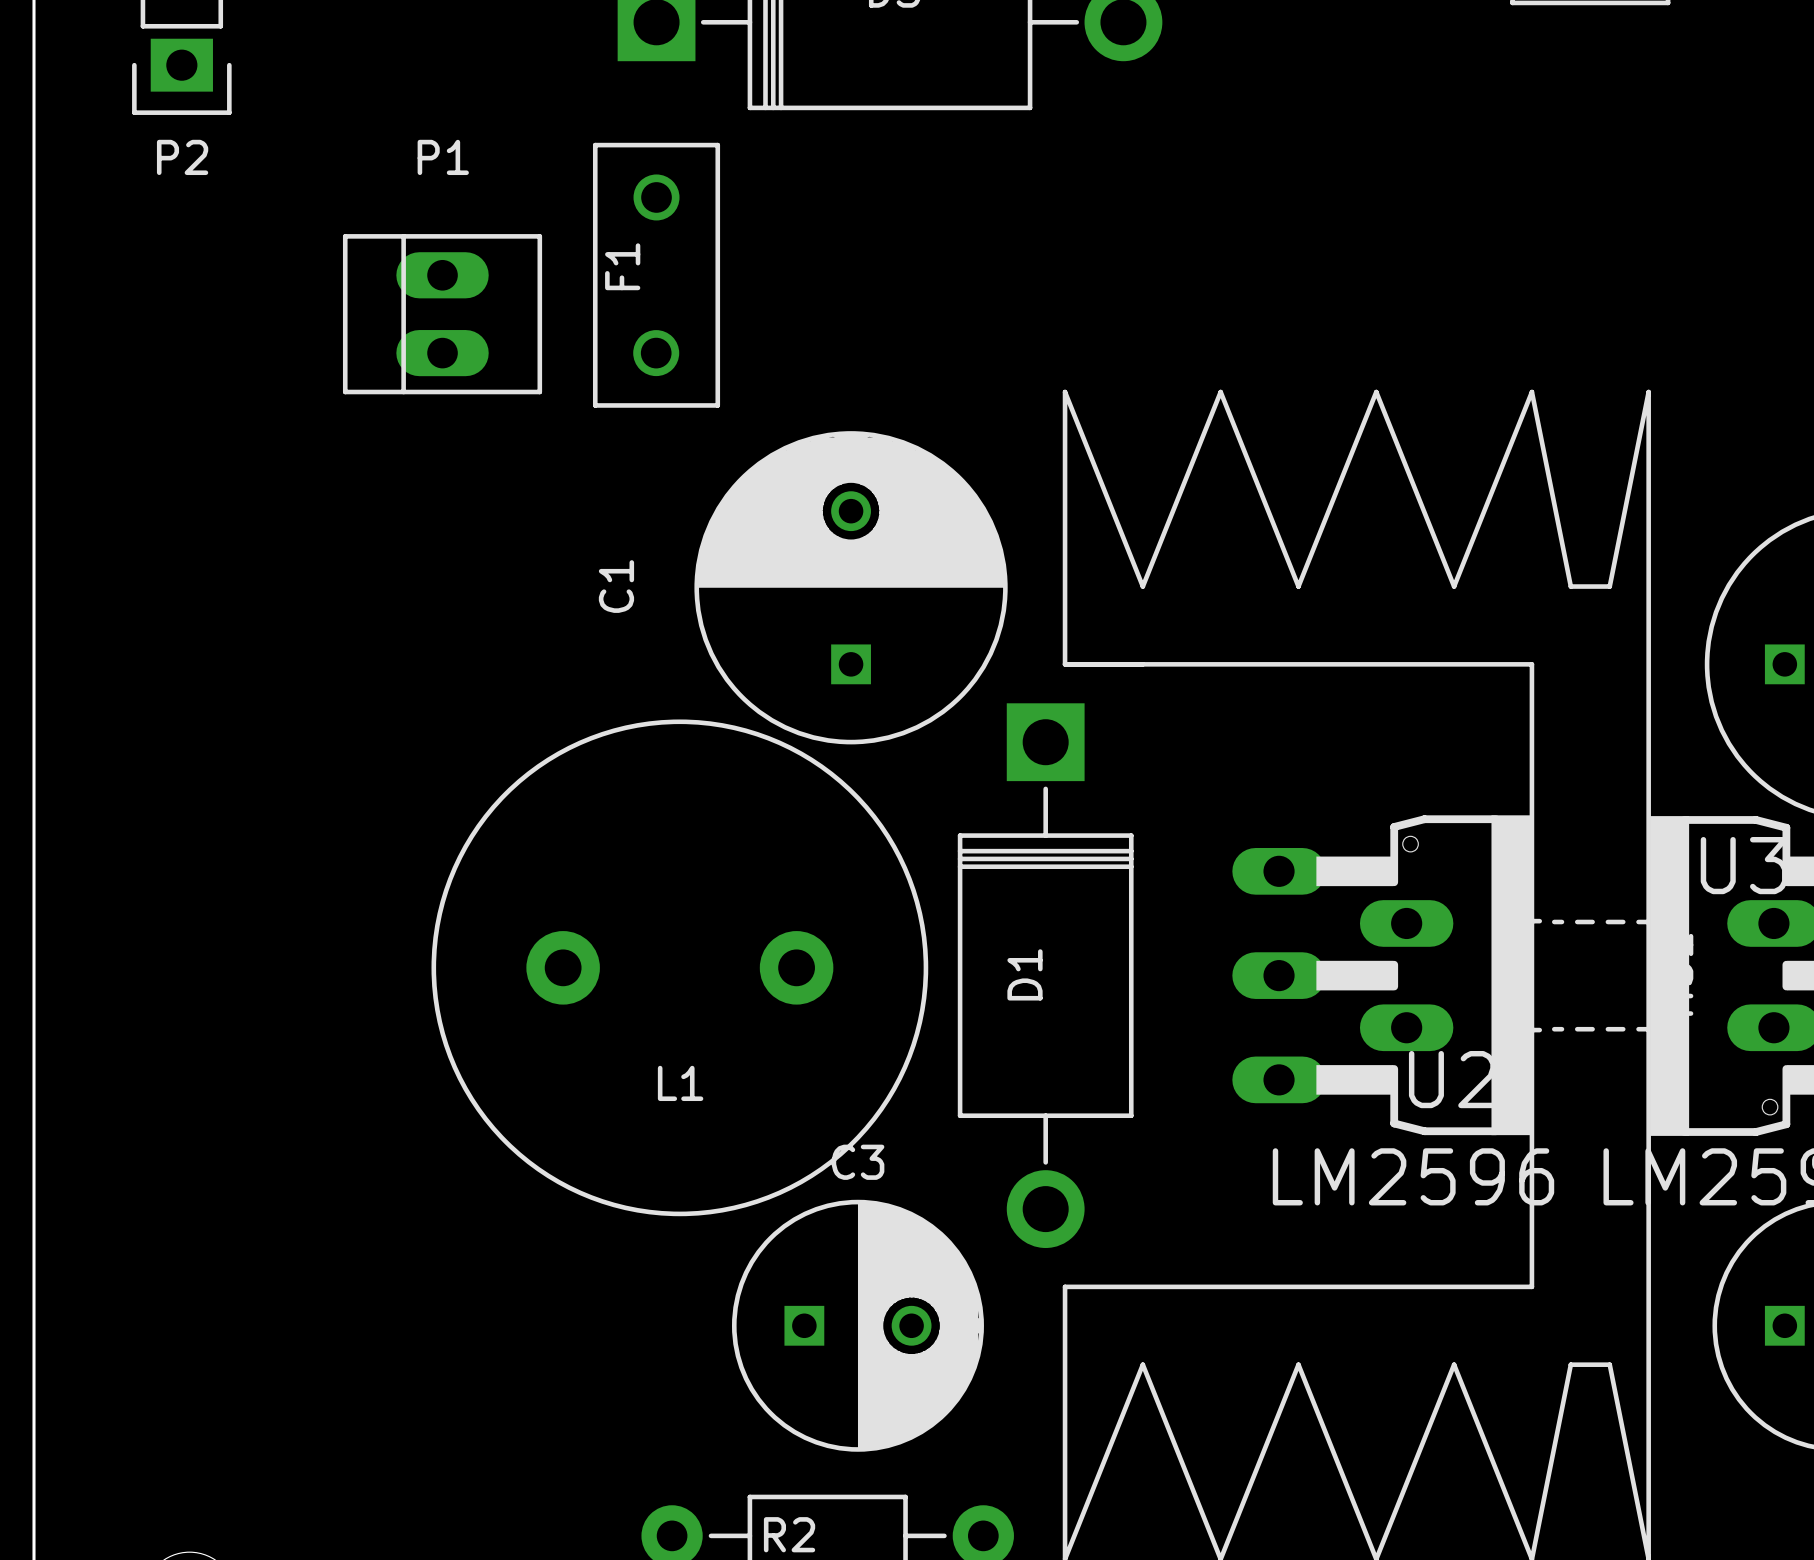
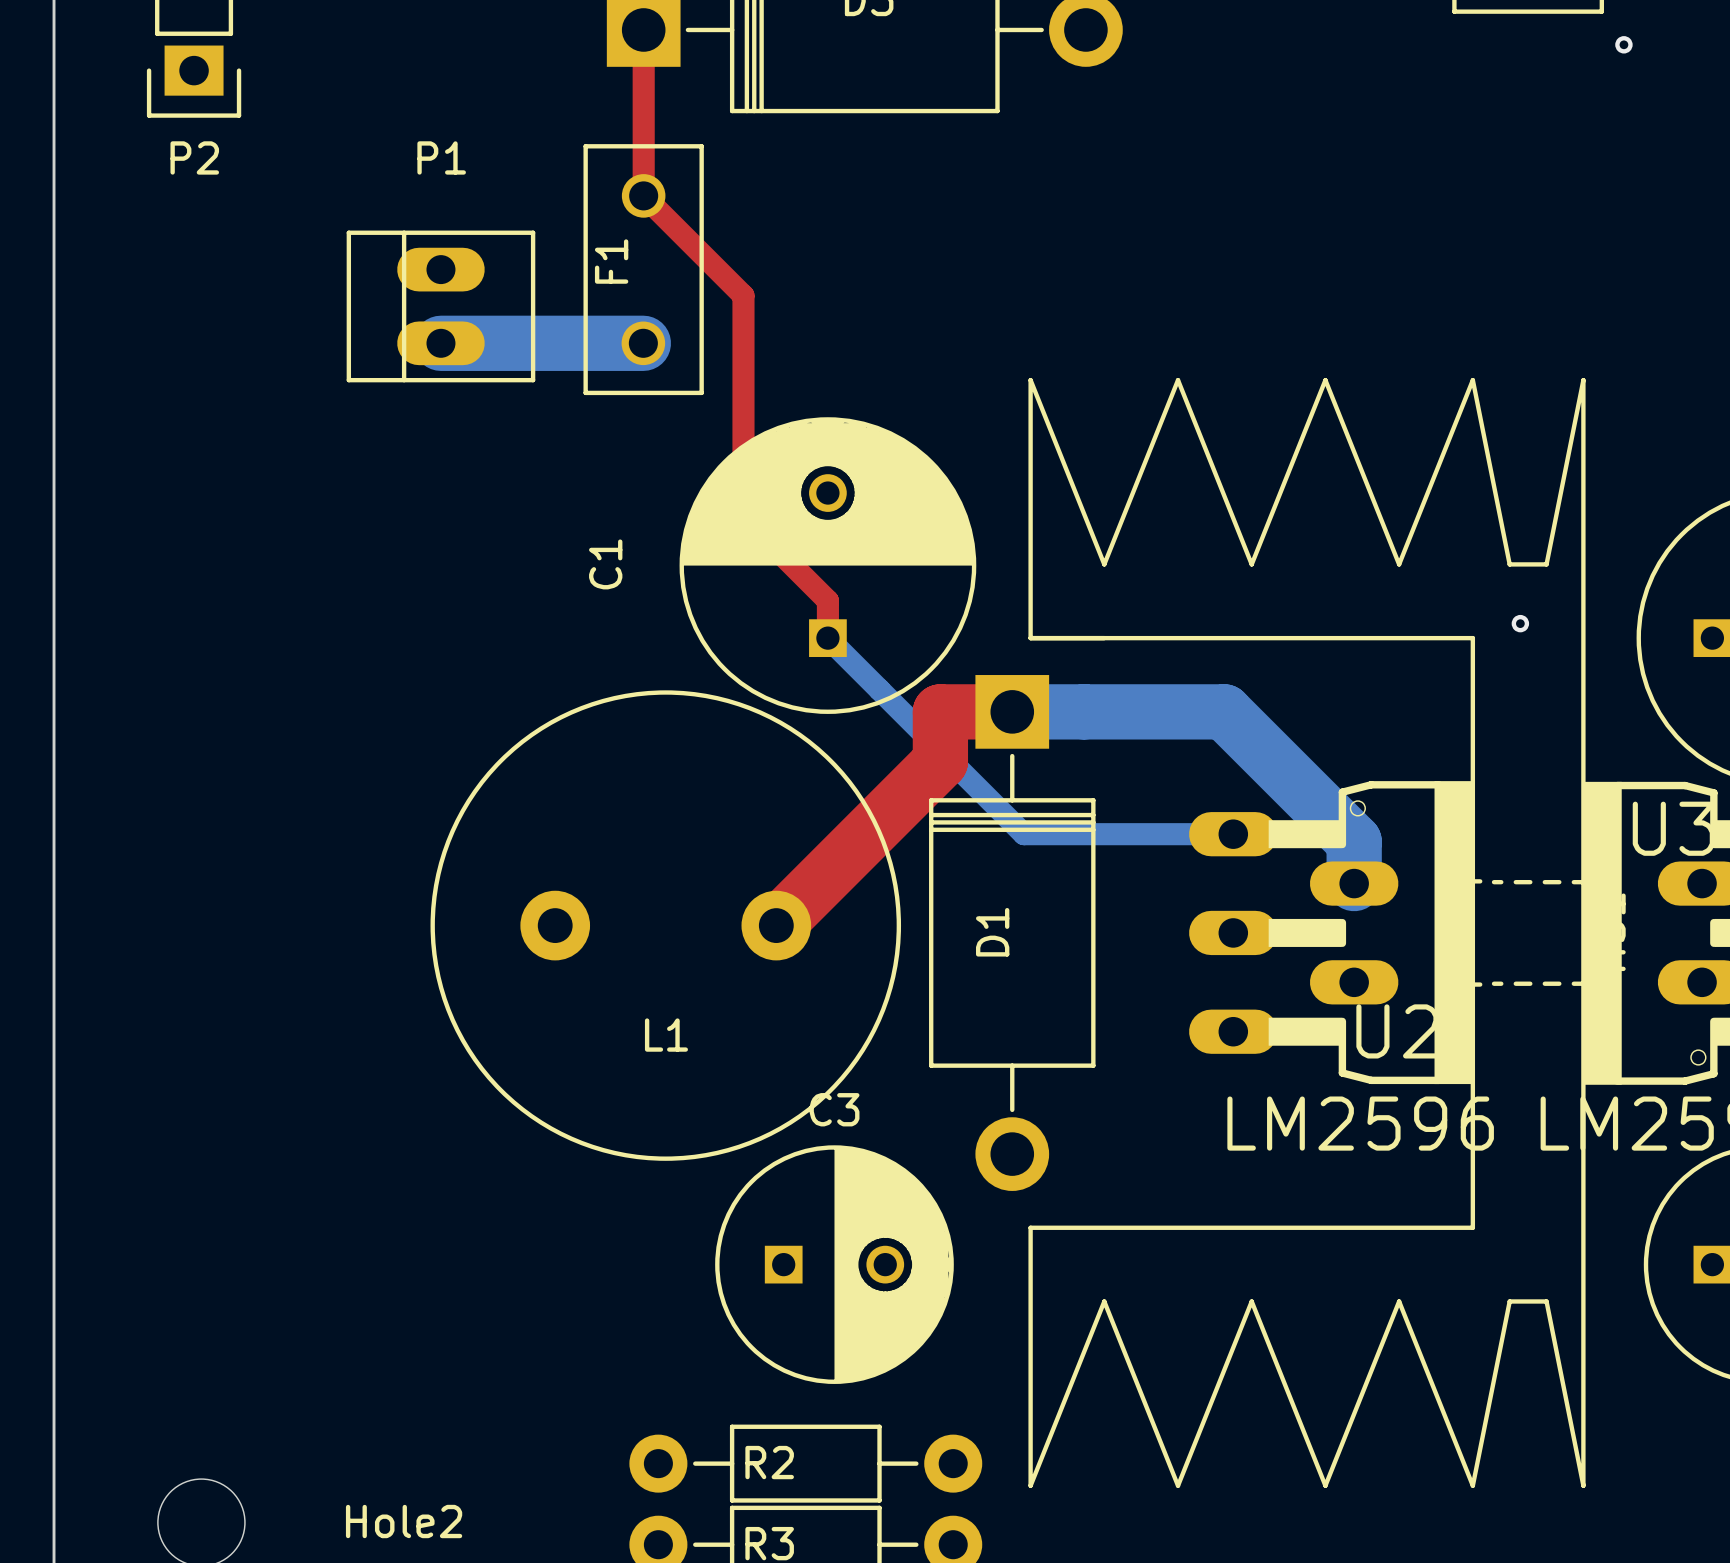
top track: none -> (643, 29) (643, 195) (743, 295) (743, 516) (827, 600) (827, 638)
via: none -> (1623, 44)
bottom track: none -> (440, 343) (643, 343)
via: none -> (1520, 623)
bottom track: none -> (827, 638) (1023, 834) (1233, 834)
bottom track: none -> (1012, 711) (1224, 711) (1354, 841) (1354, 883)
top track: none -> (1012, 711) (940, 711) (940, 761) (776, 925)

